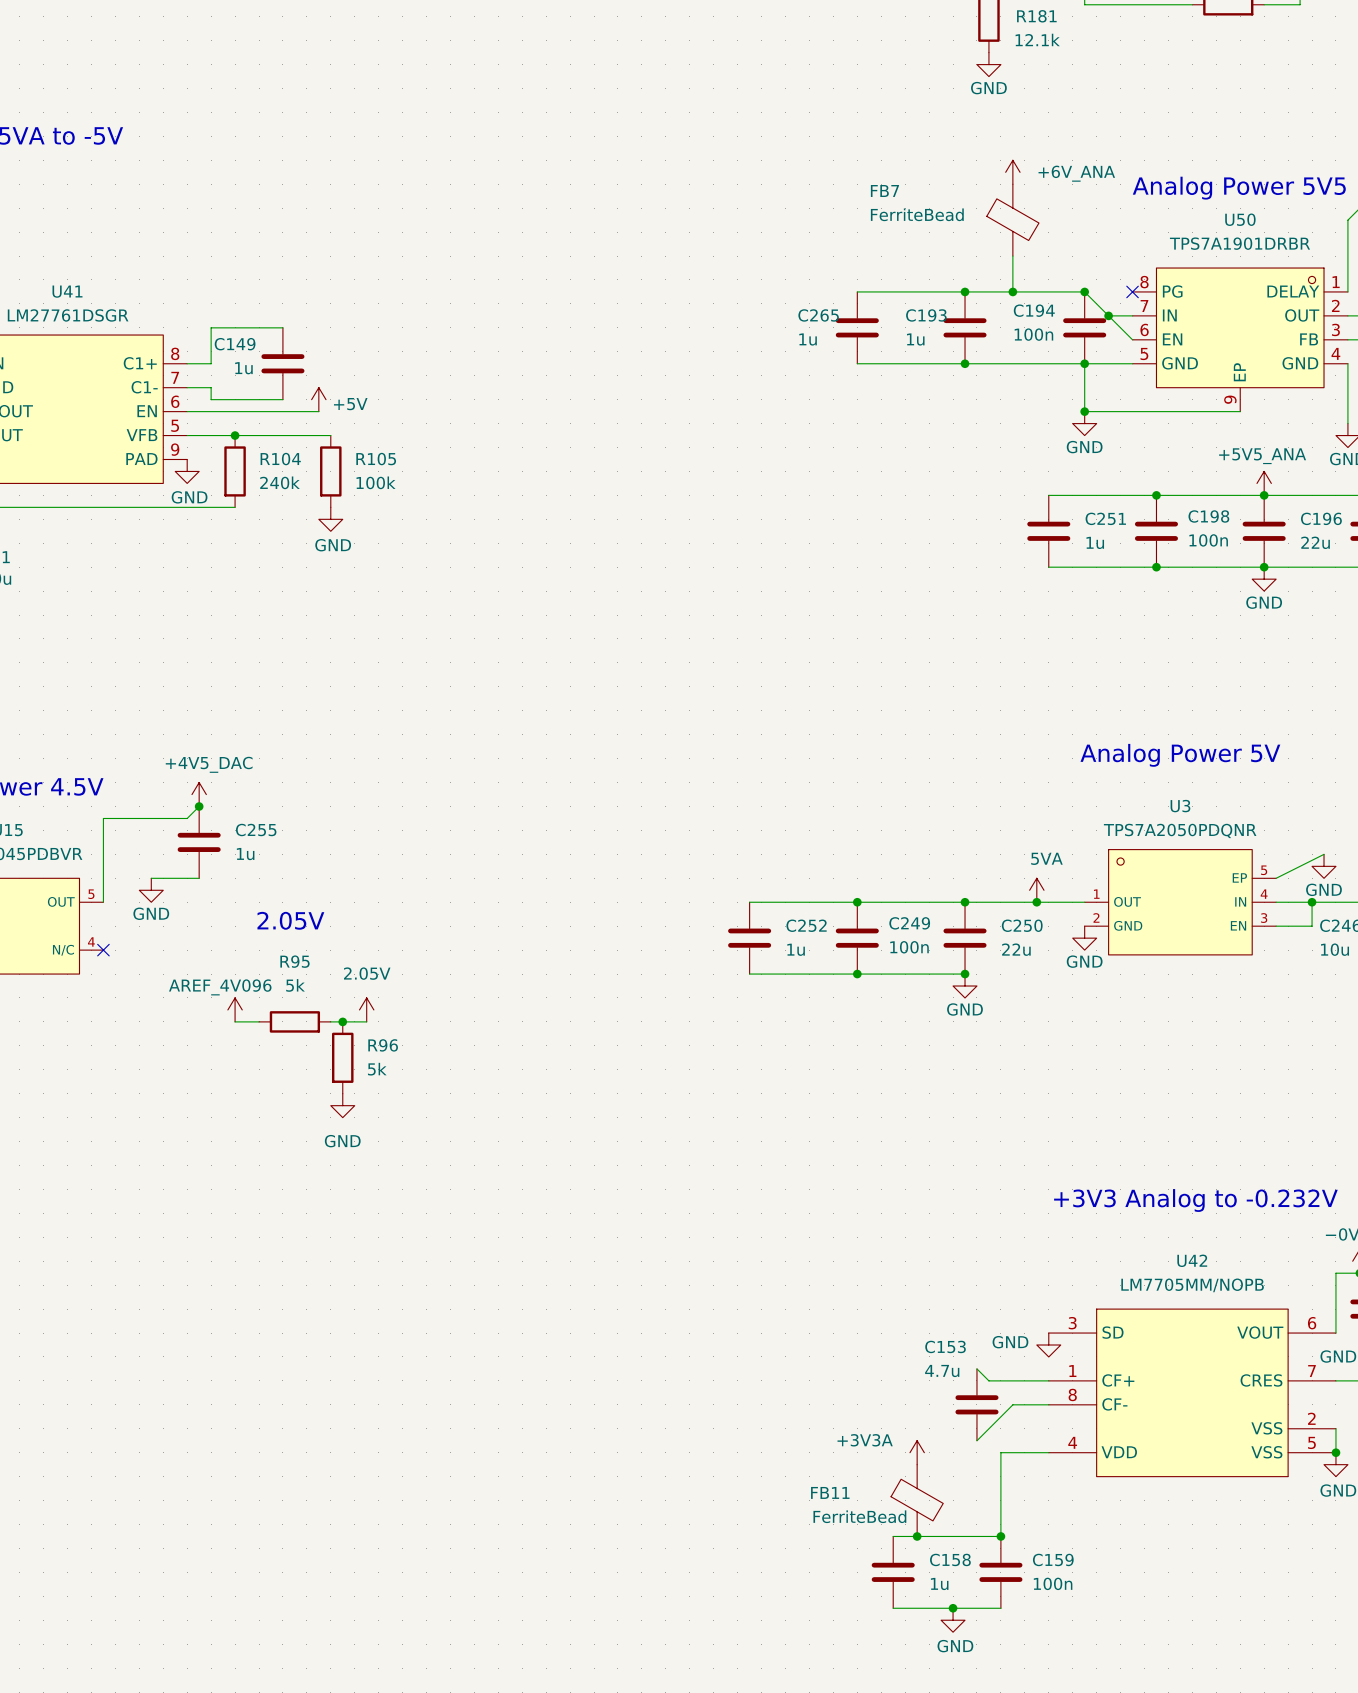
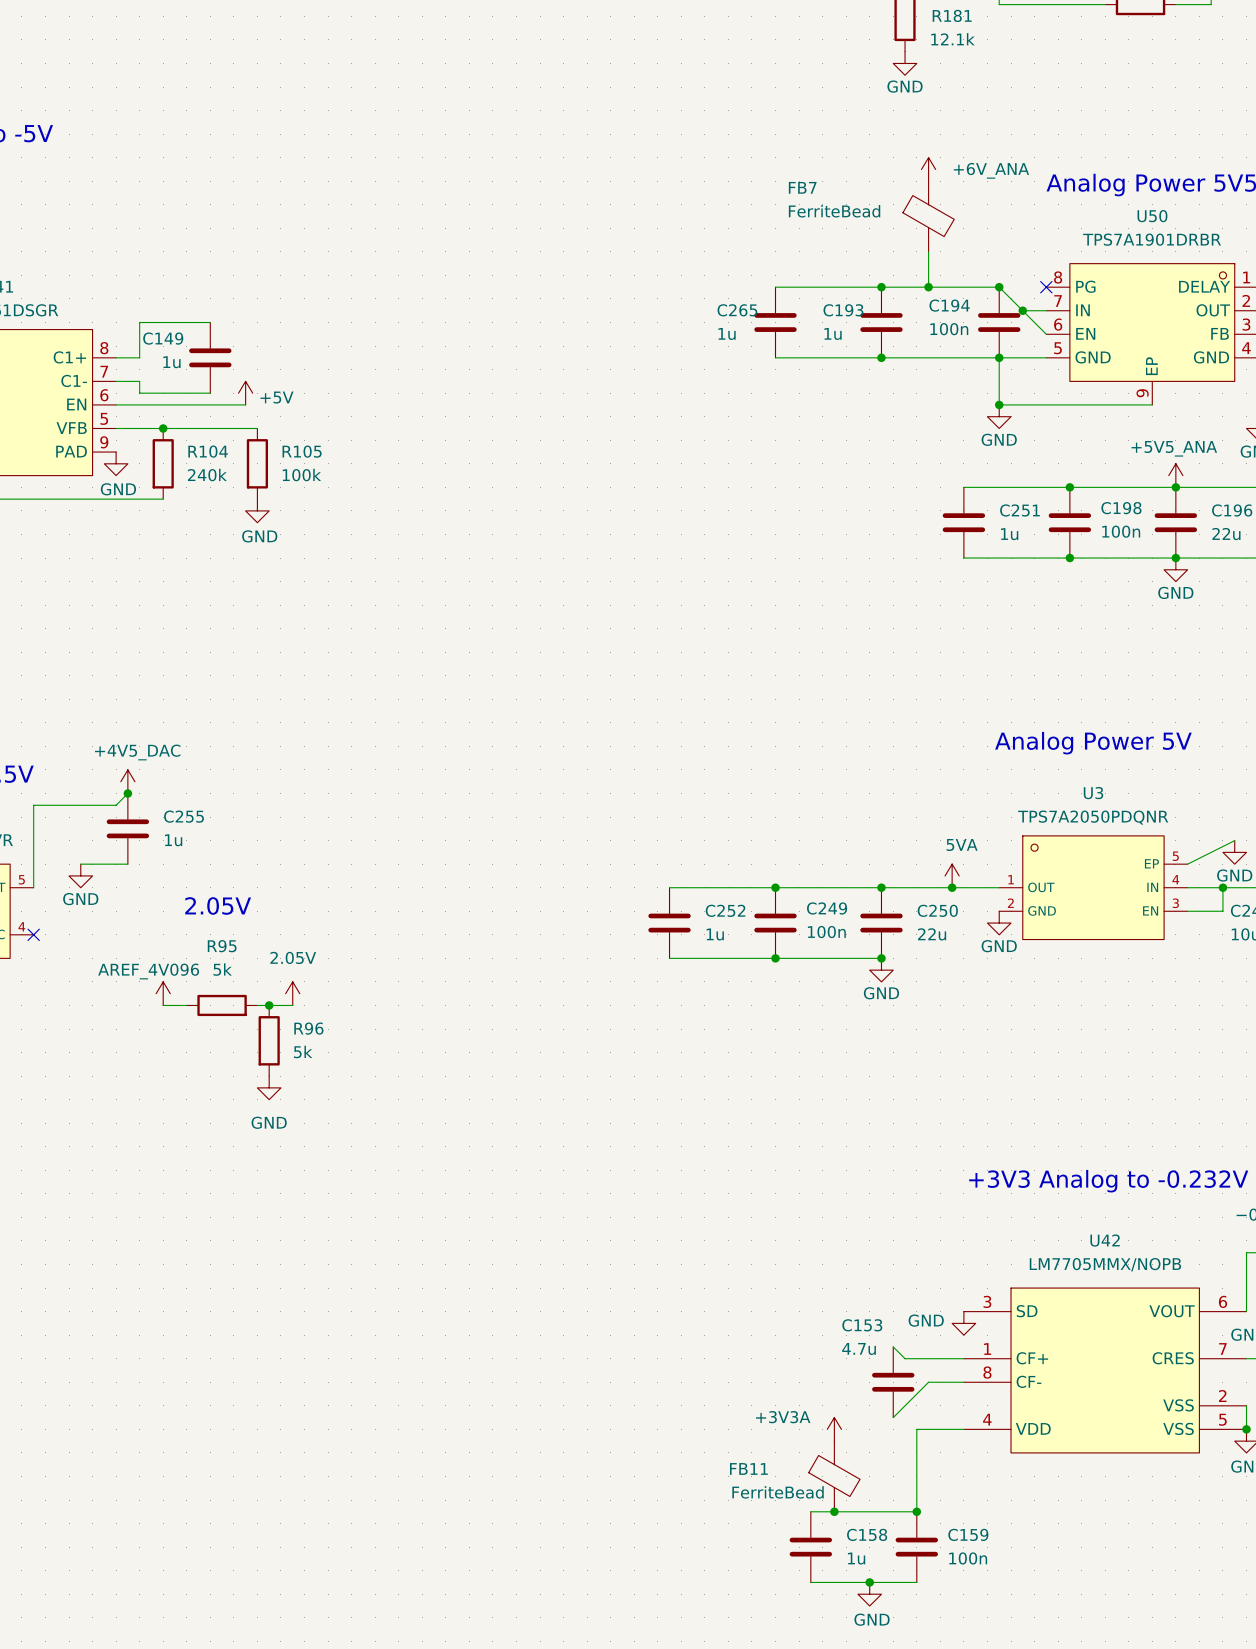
U42 value: LM7705MM/NOPB (1192, 1285) -> LM7705MMX/NOPB (1105, 1264)

